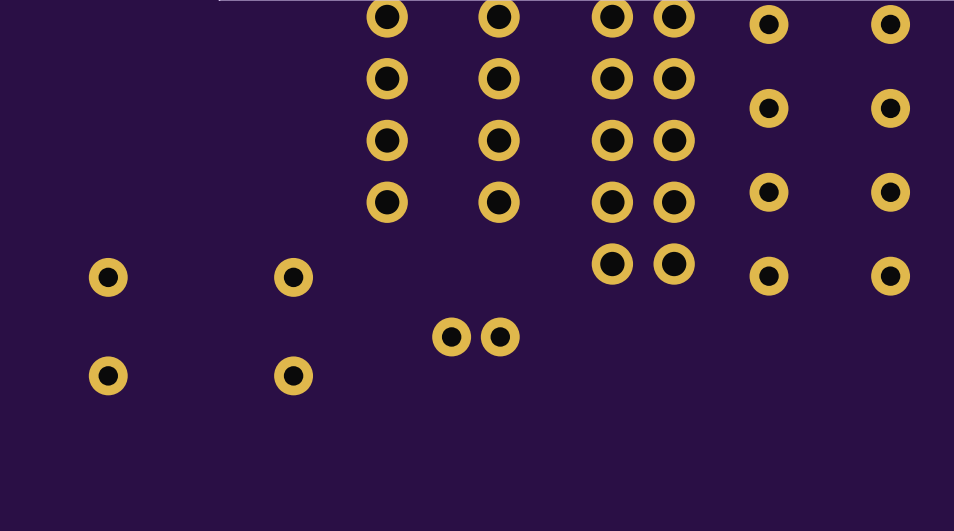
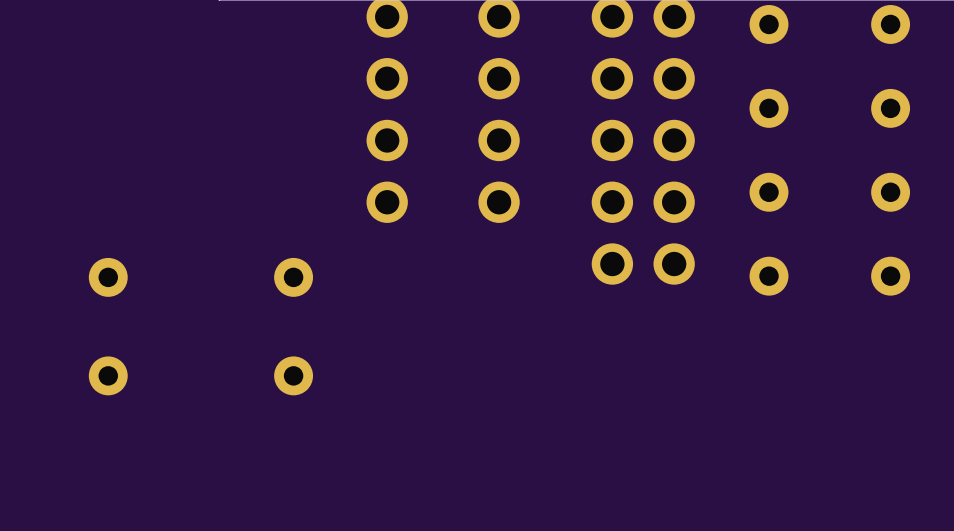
part: (475, 336) -> none

